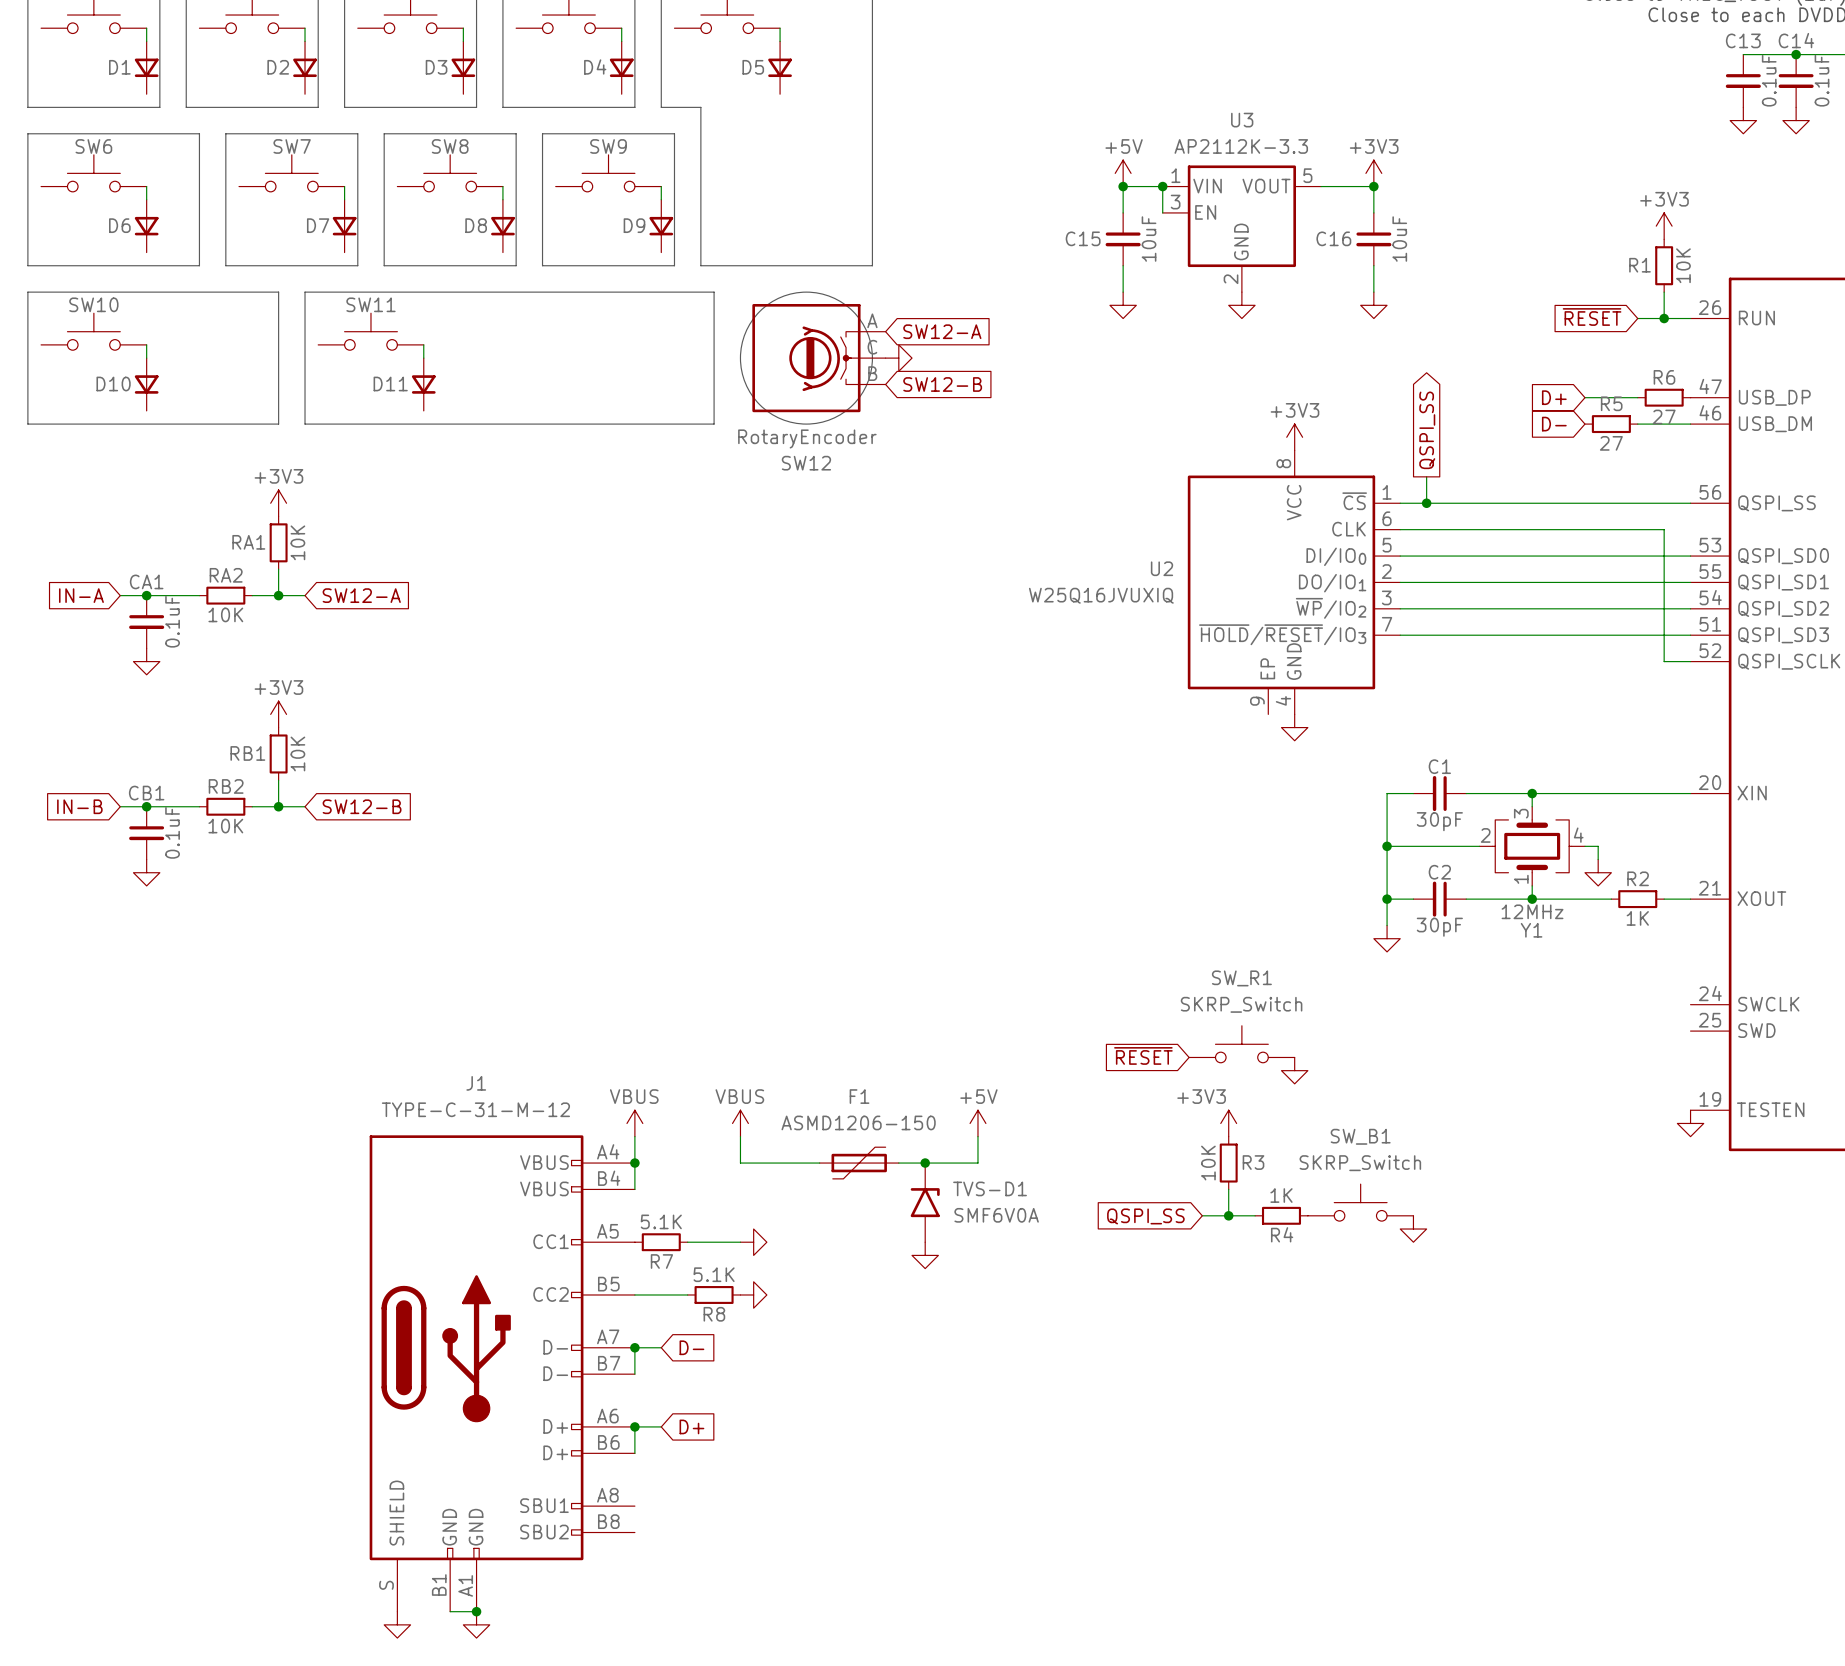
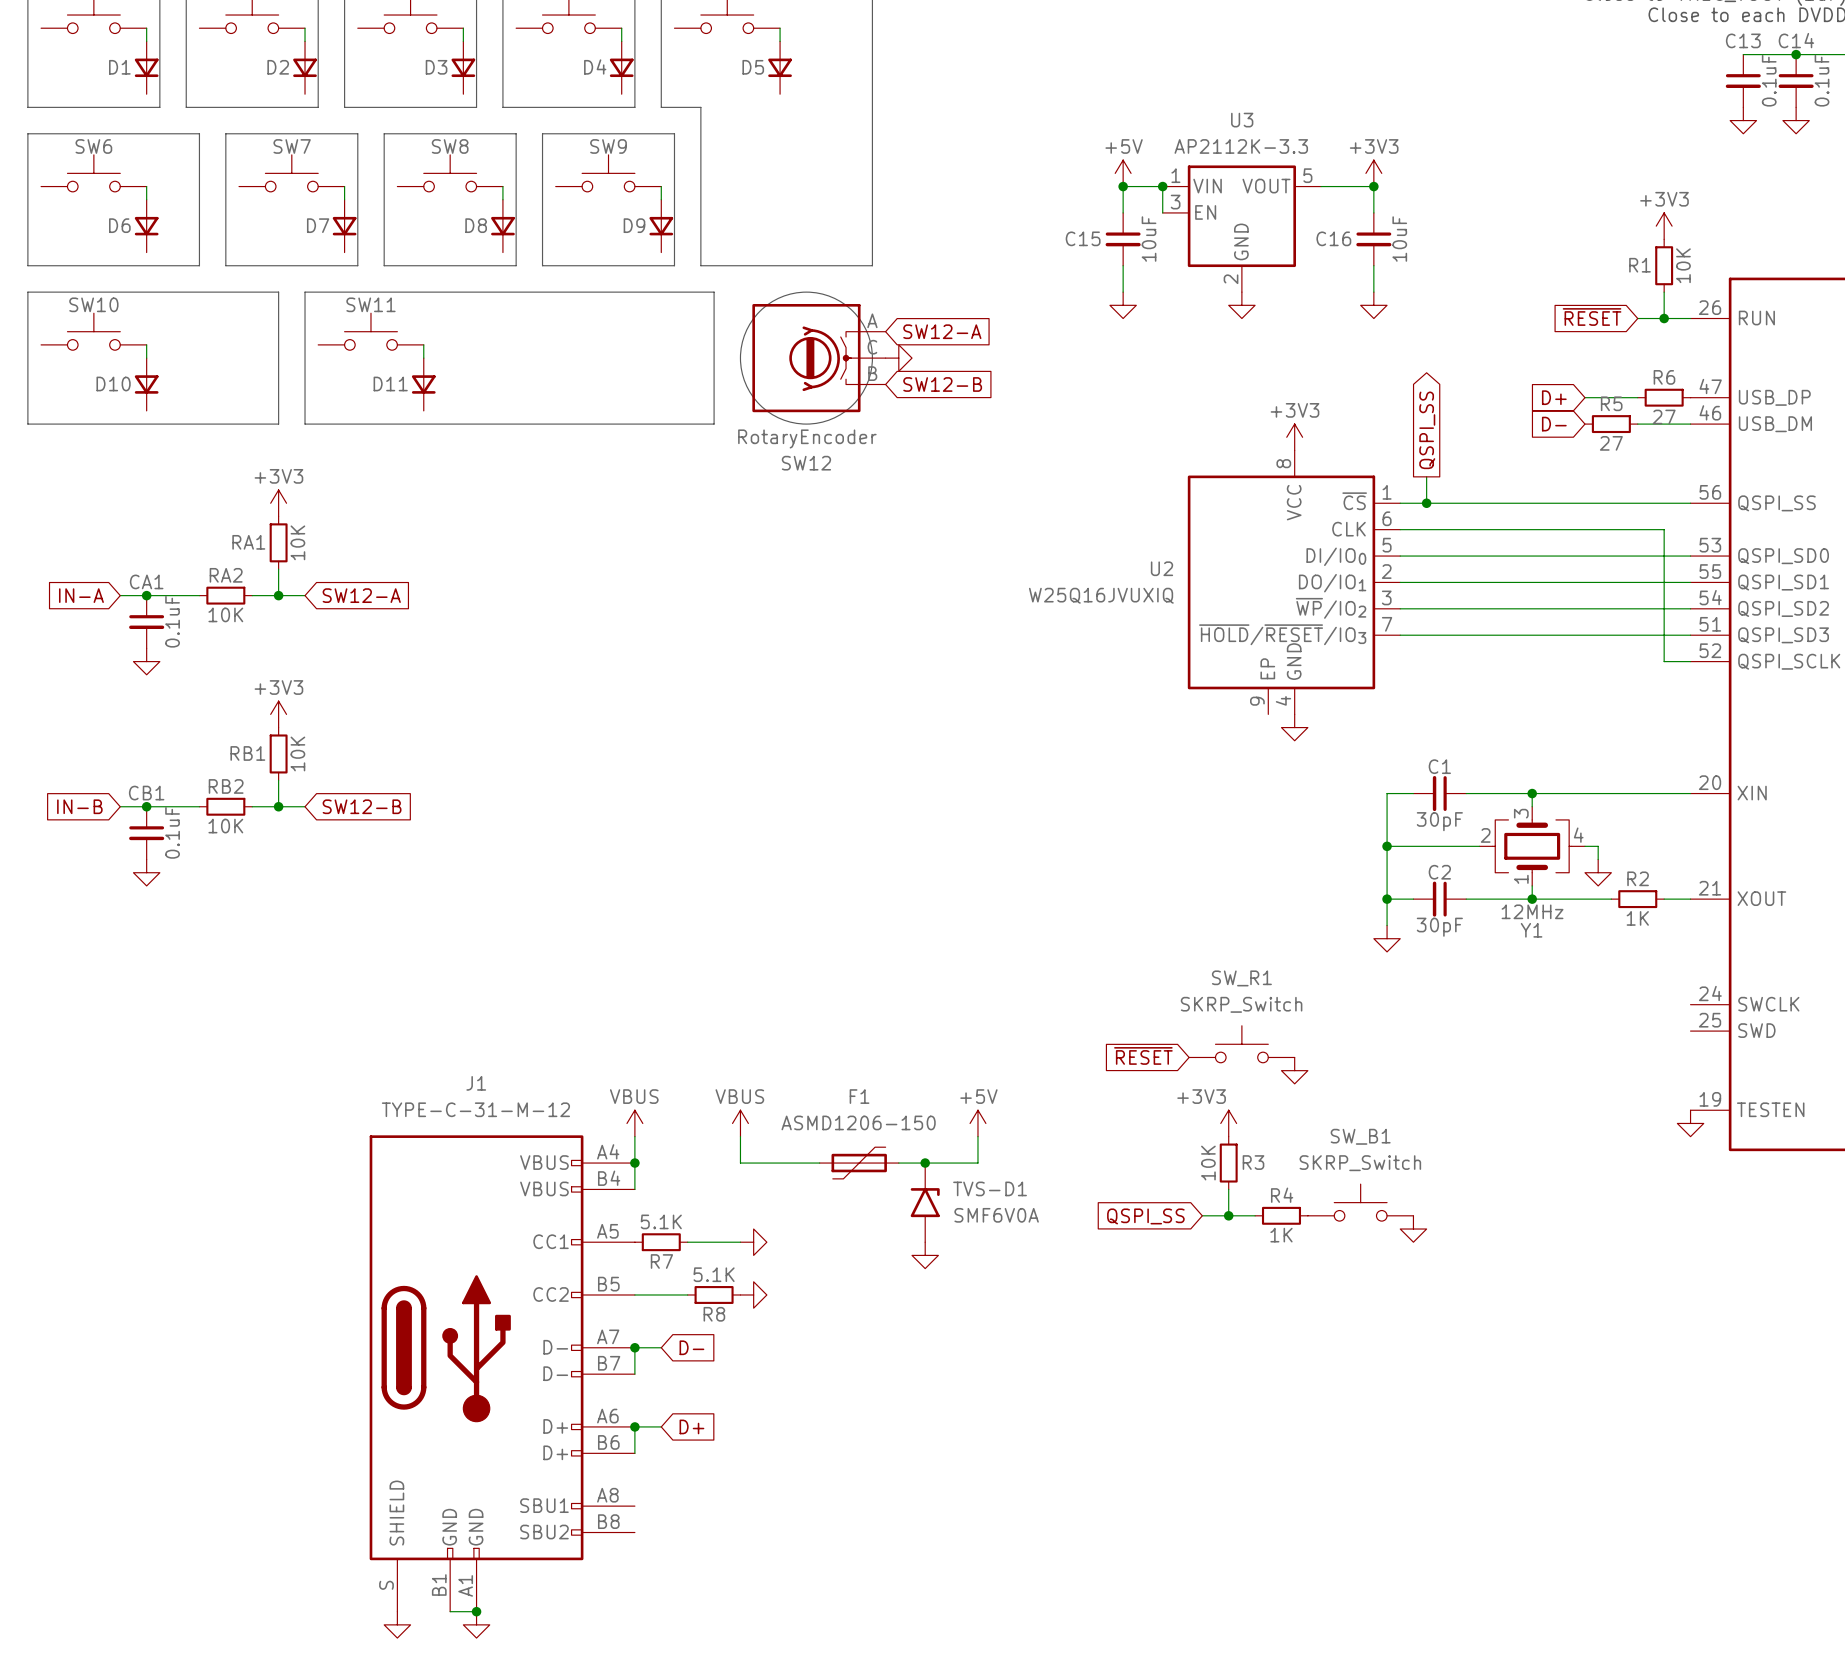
R4 value position: 1K (1281, 1195) -> 1K (1281, 1235)
R4 name position: R4 (1282, 1234) -> R4 (1282, 1195)

